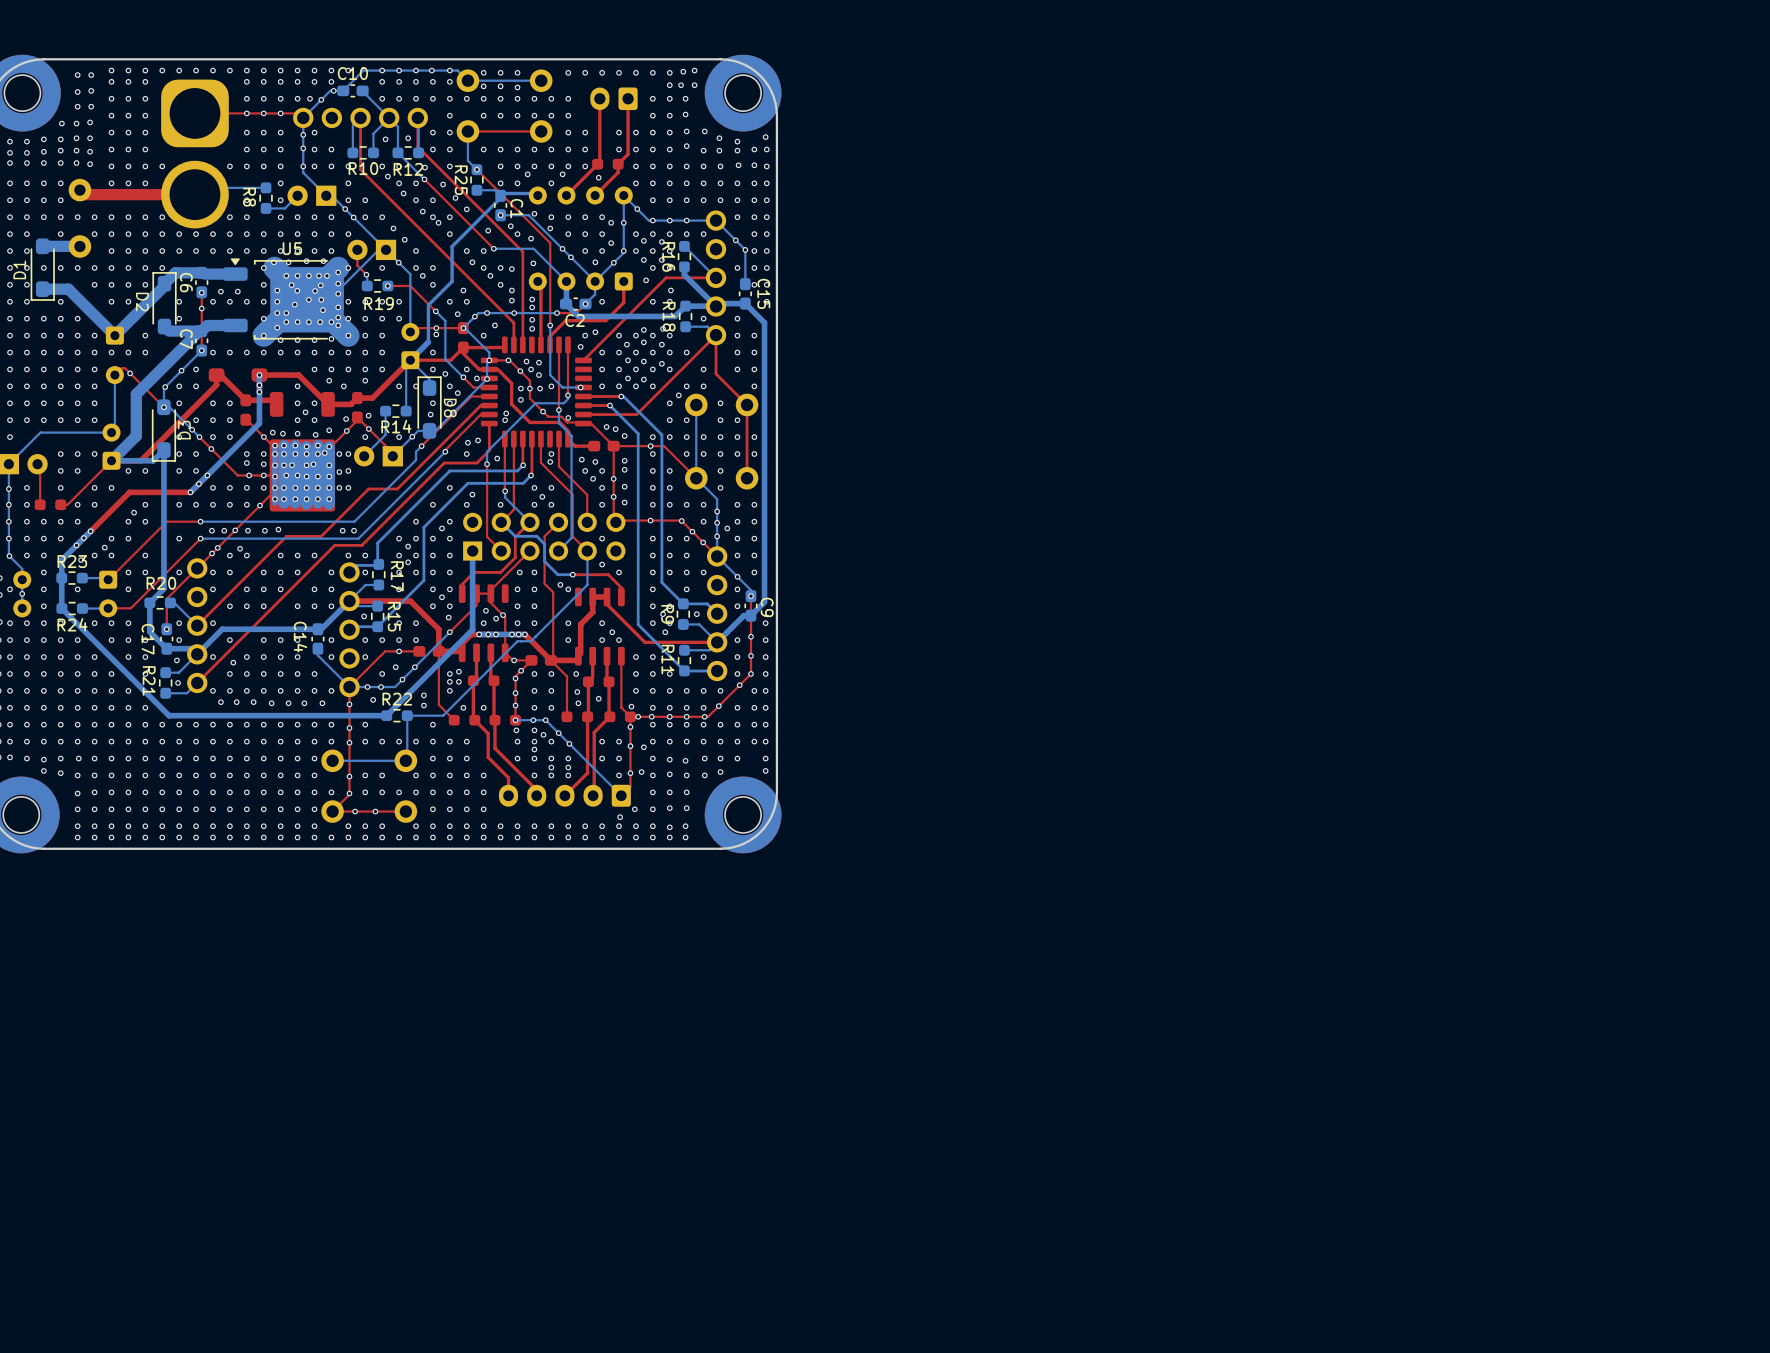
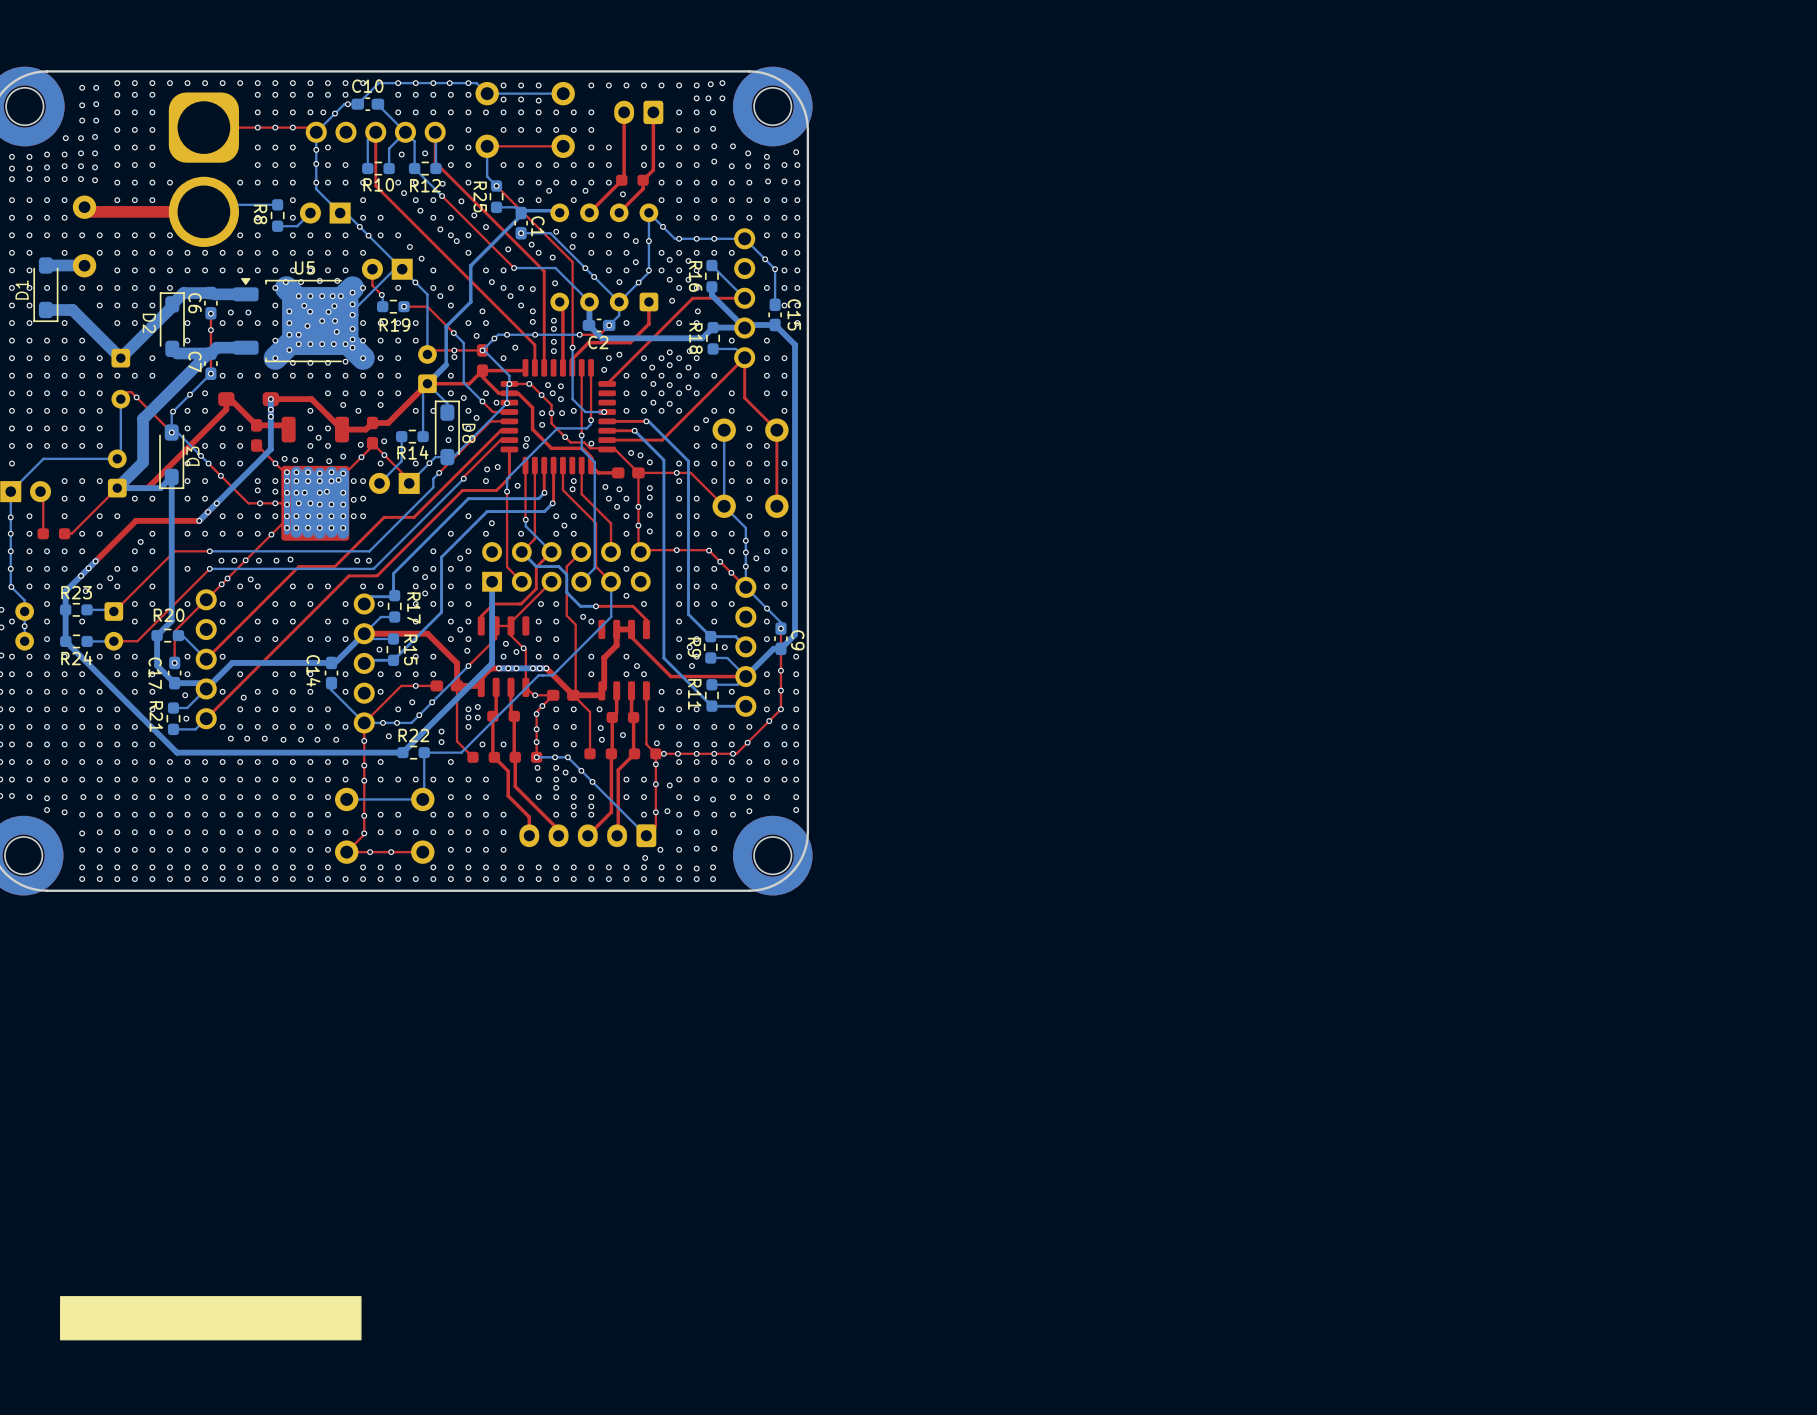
drawing: none -> [60, 1296, 362, 1341]

